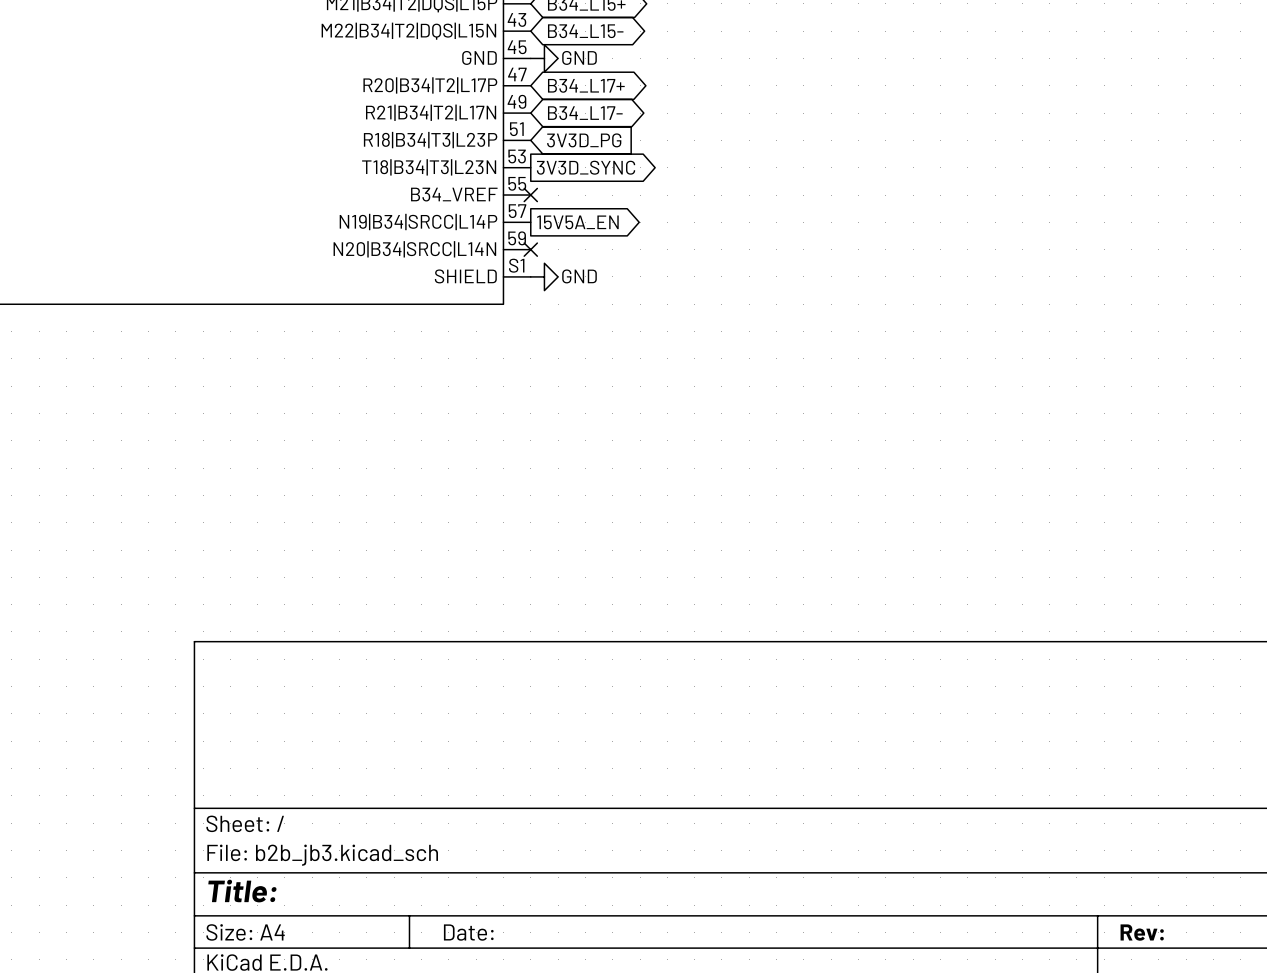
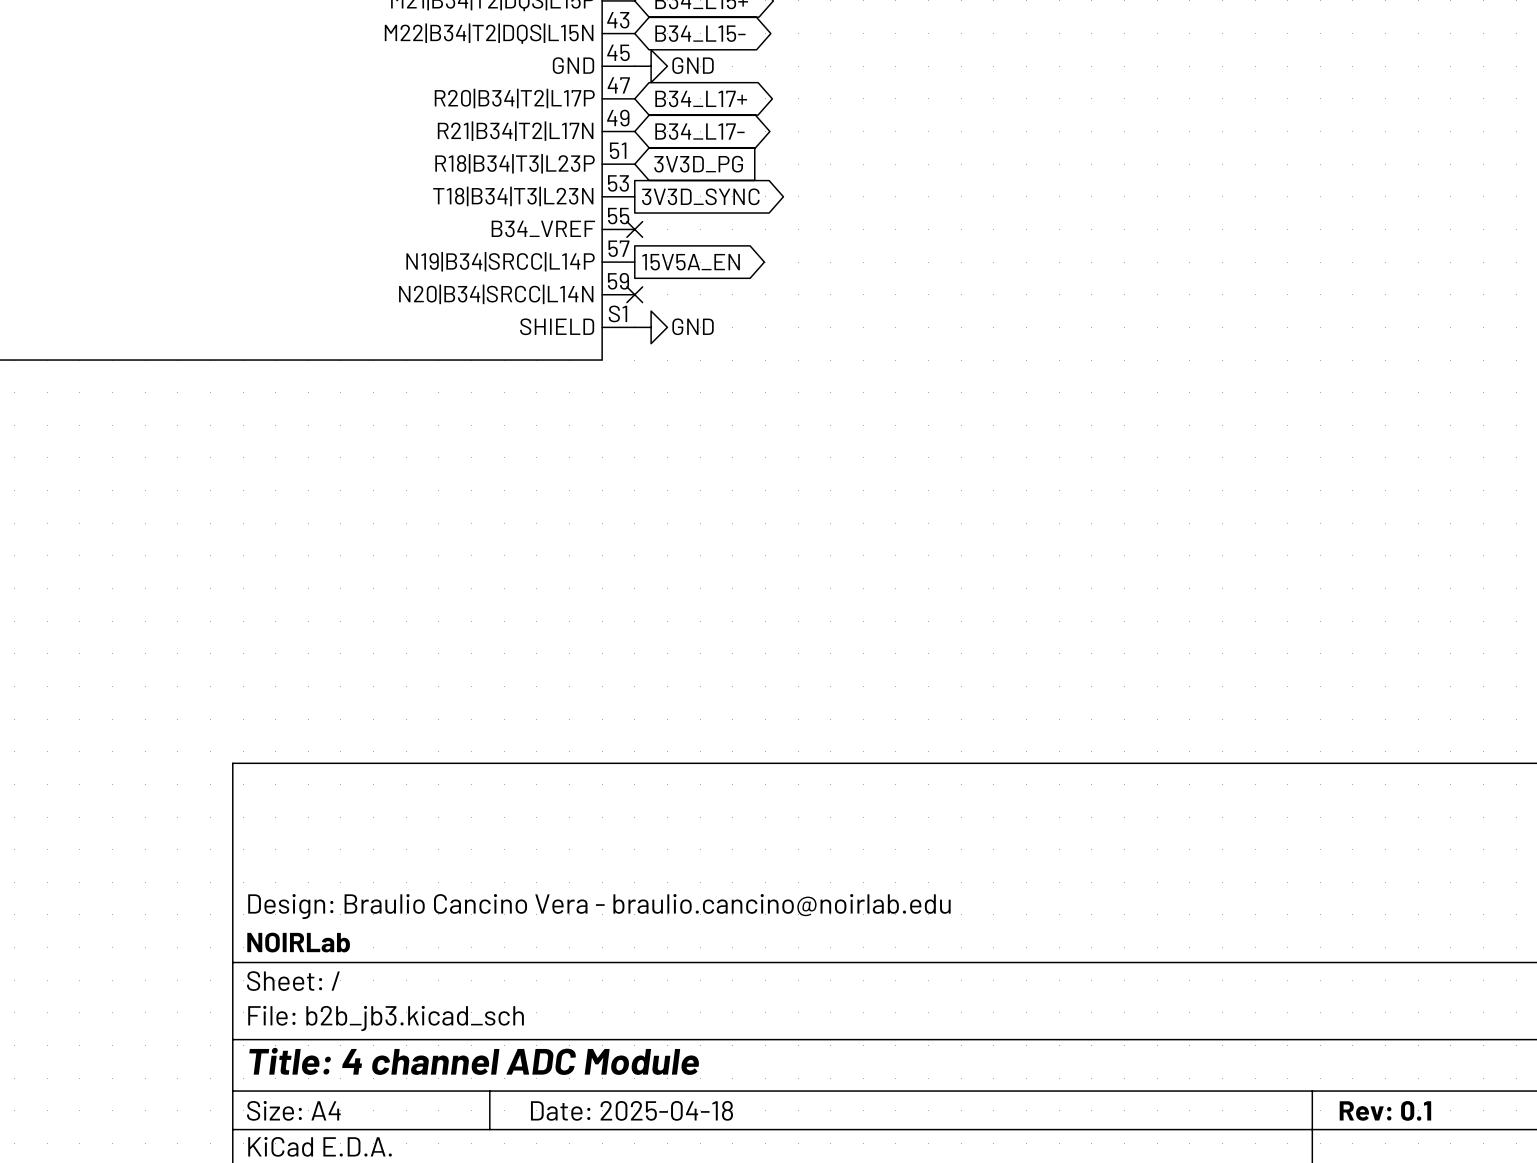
title block: none -> Design: Braulio Cancino Vera - braulio.cancino@noirlab.edu (599, 906)
title block: none -> NOIRLab (298, 942)
title block: Title: (242, 891) -> Title: 4 channel ADC Module (474, 1061)
title block: Date: (468, 932) -> Date: 2025-04-18 (631, 1110)
title block: Rev: (1142, 932) -> Rev: 0.1 (1385, 1110)

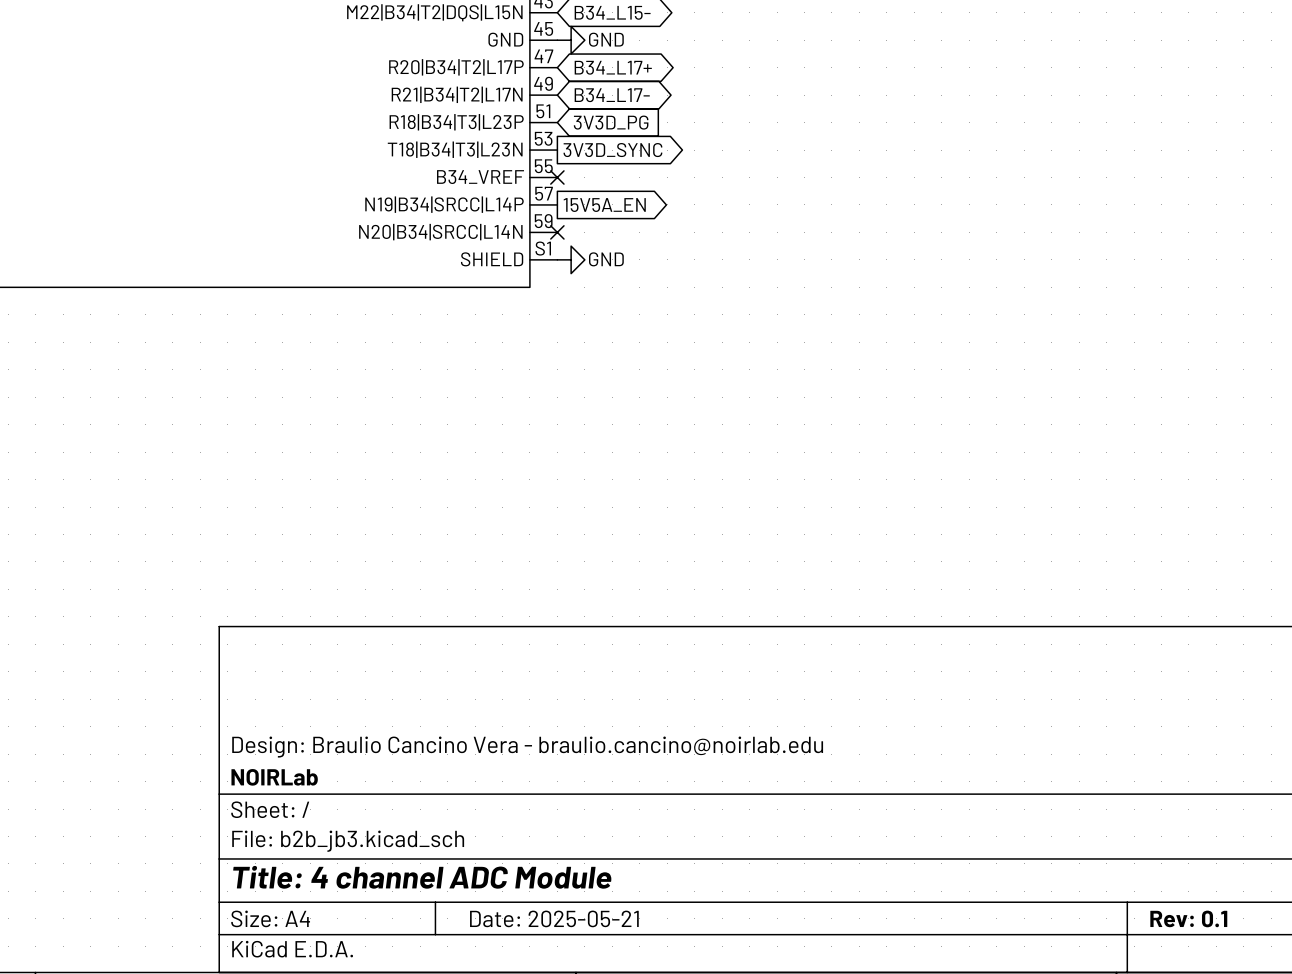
title block: Date: 2025-04-18 (631, 1110) -> Date: 2025-05-21 (554, 918)

